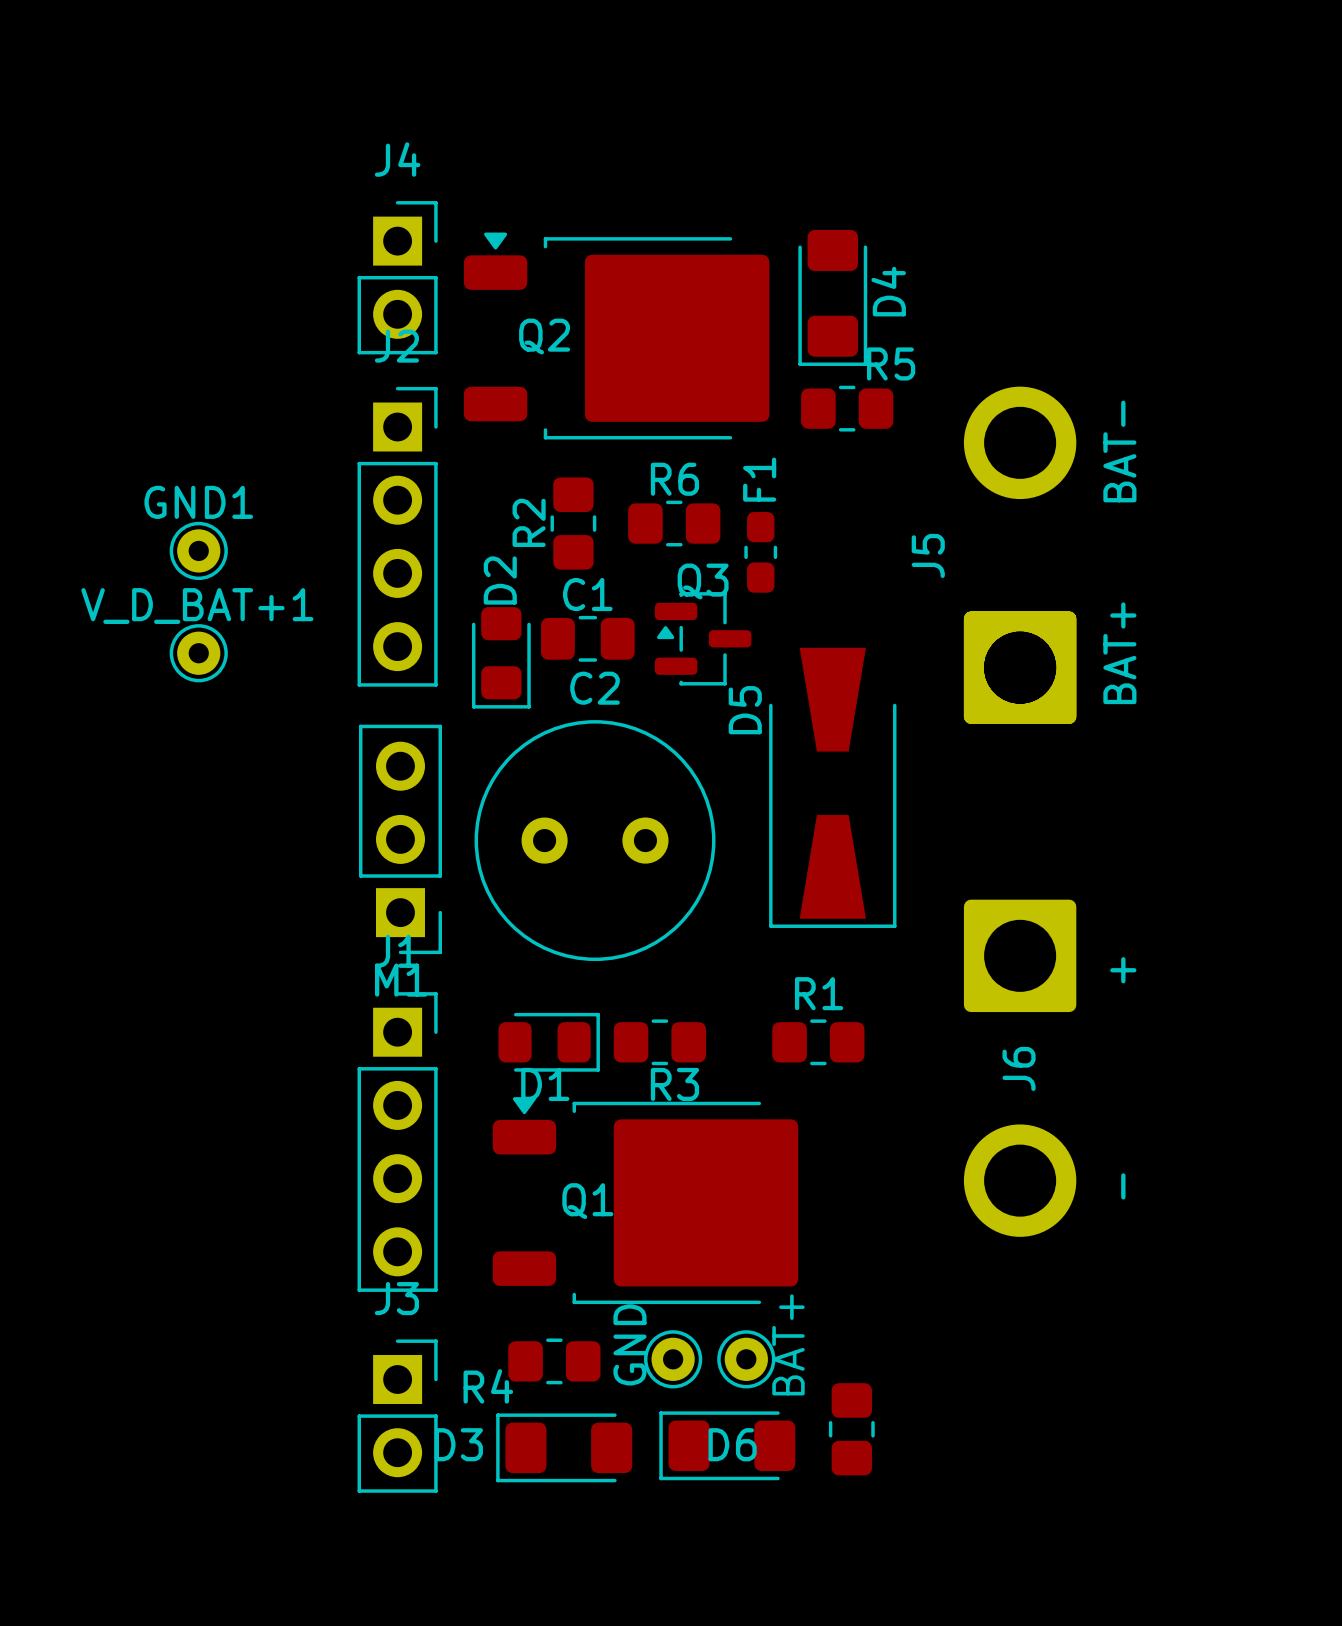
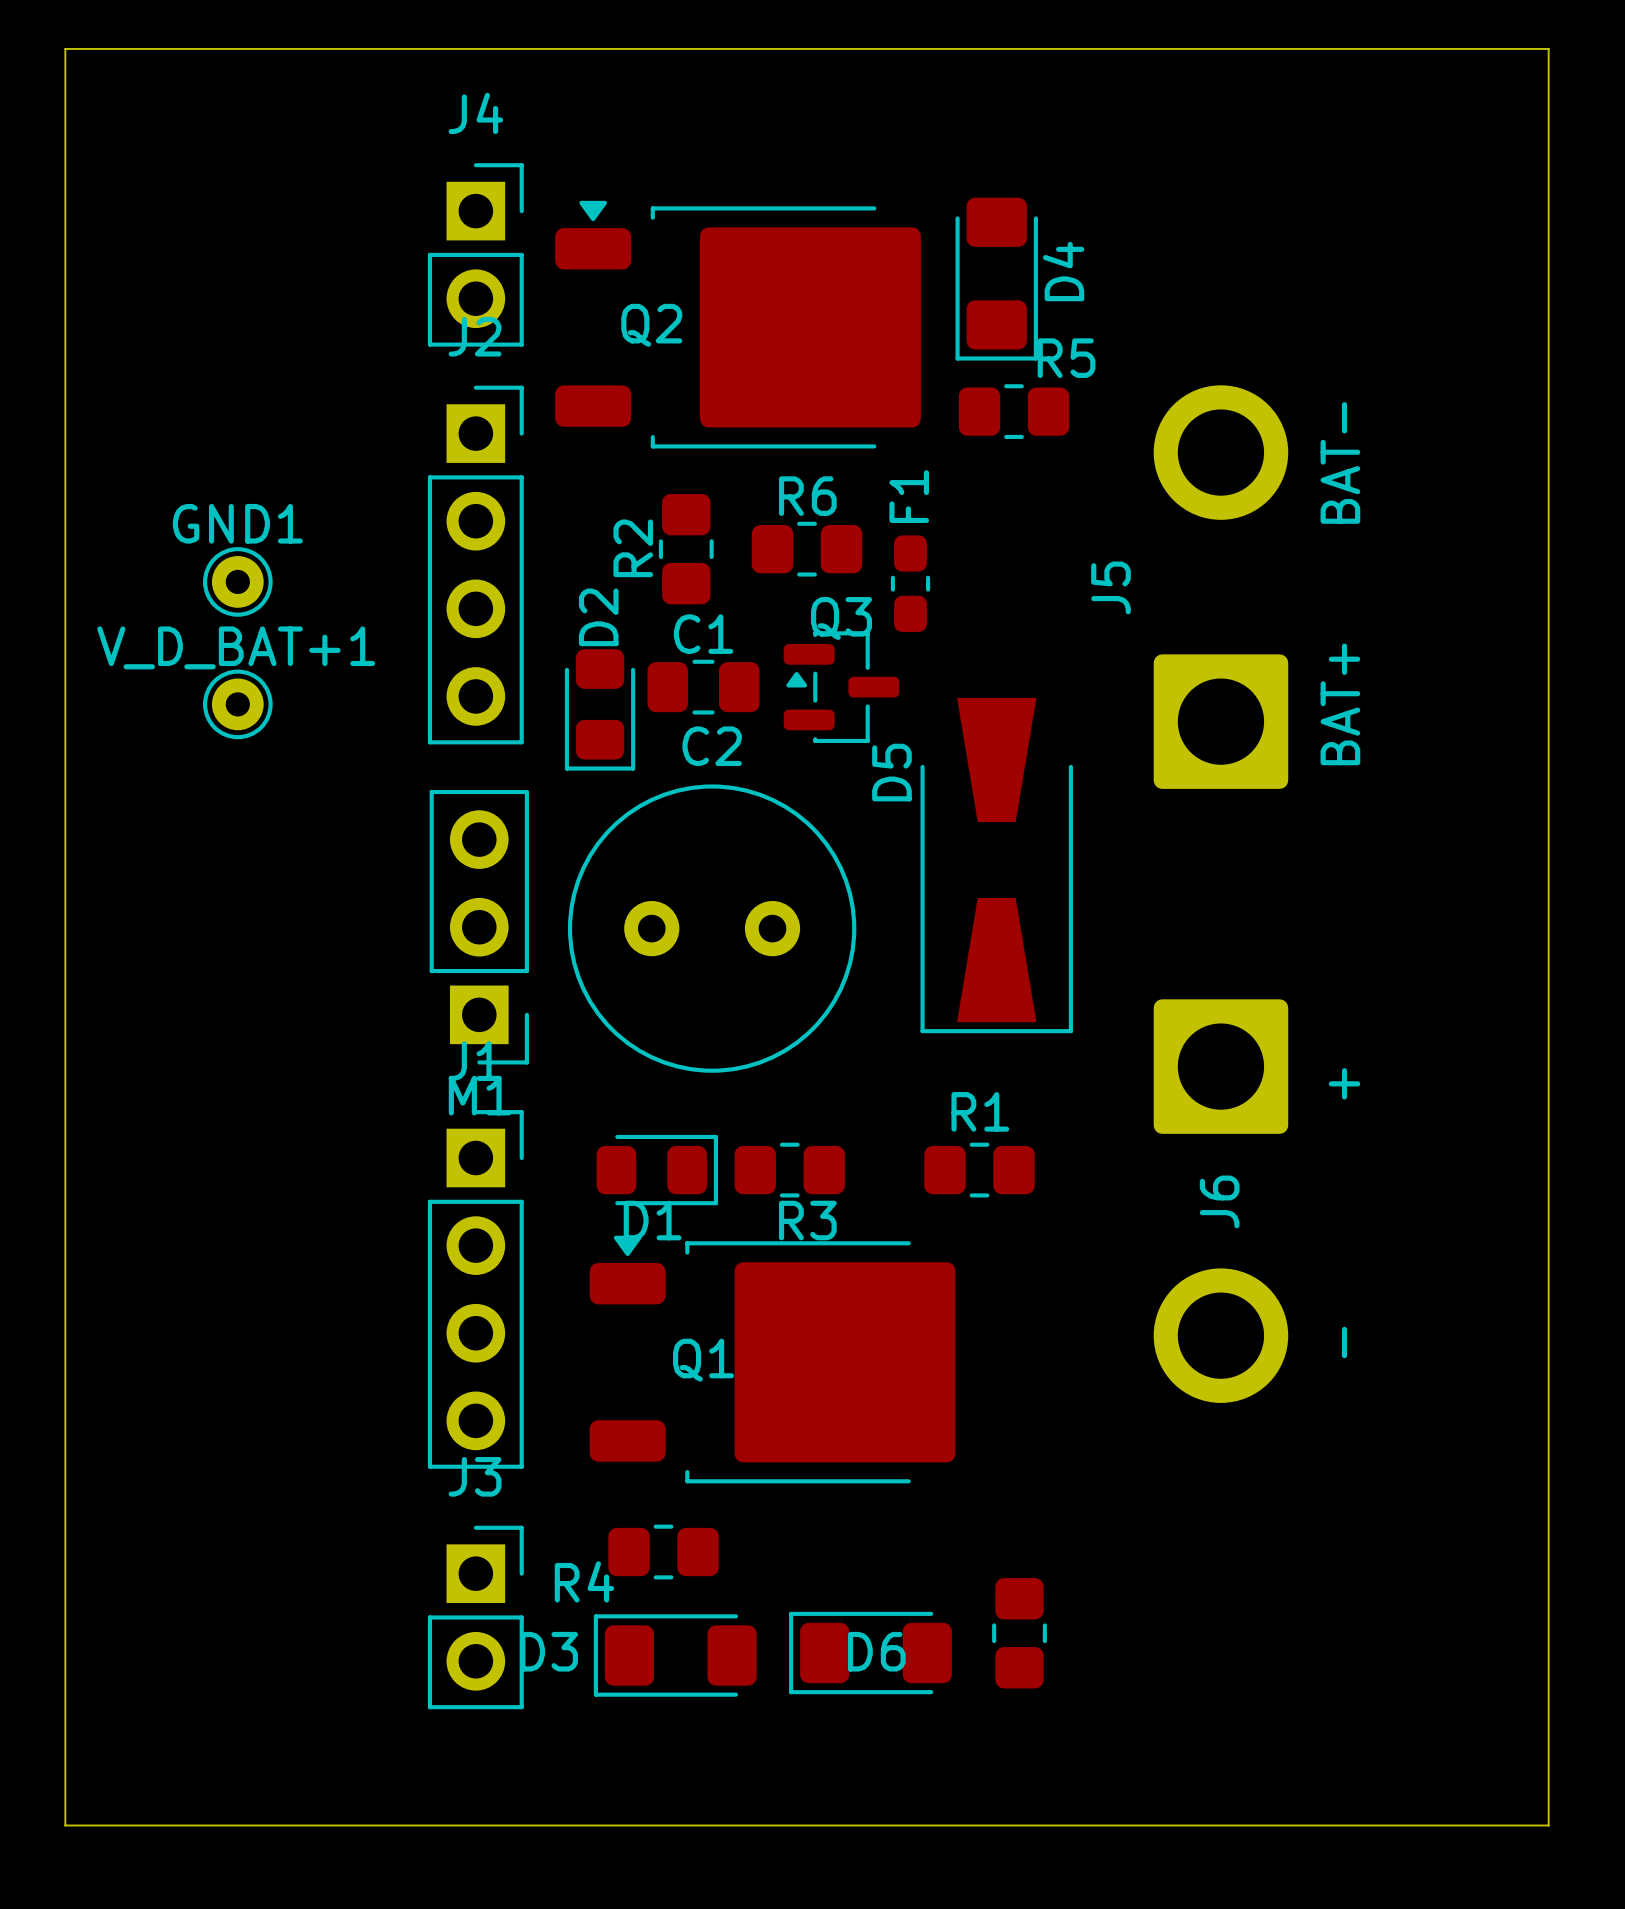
board edge: none -> (65, 48) (1548, 48) (1548, 1825) (65, 1825) (65, 48)
part: (1020, 667) -> none
GND: (673, 1359) -> none
BAT+: (746, 1359) -> none

